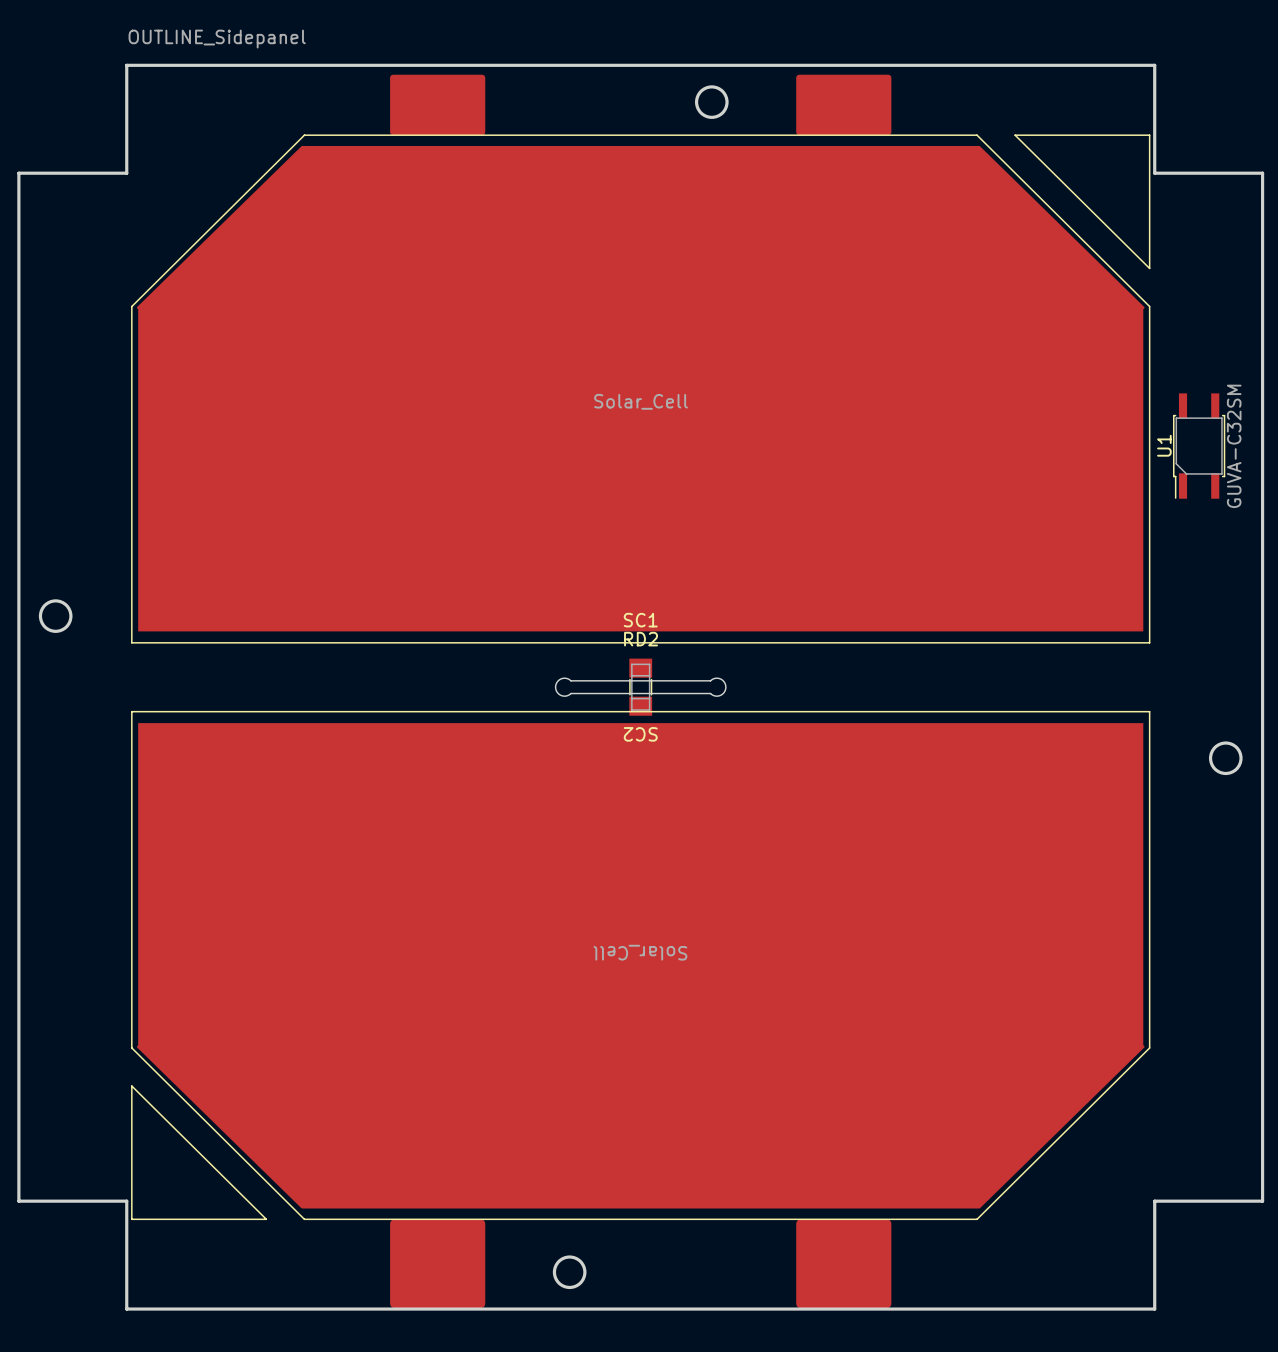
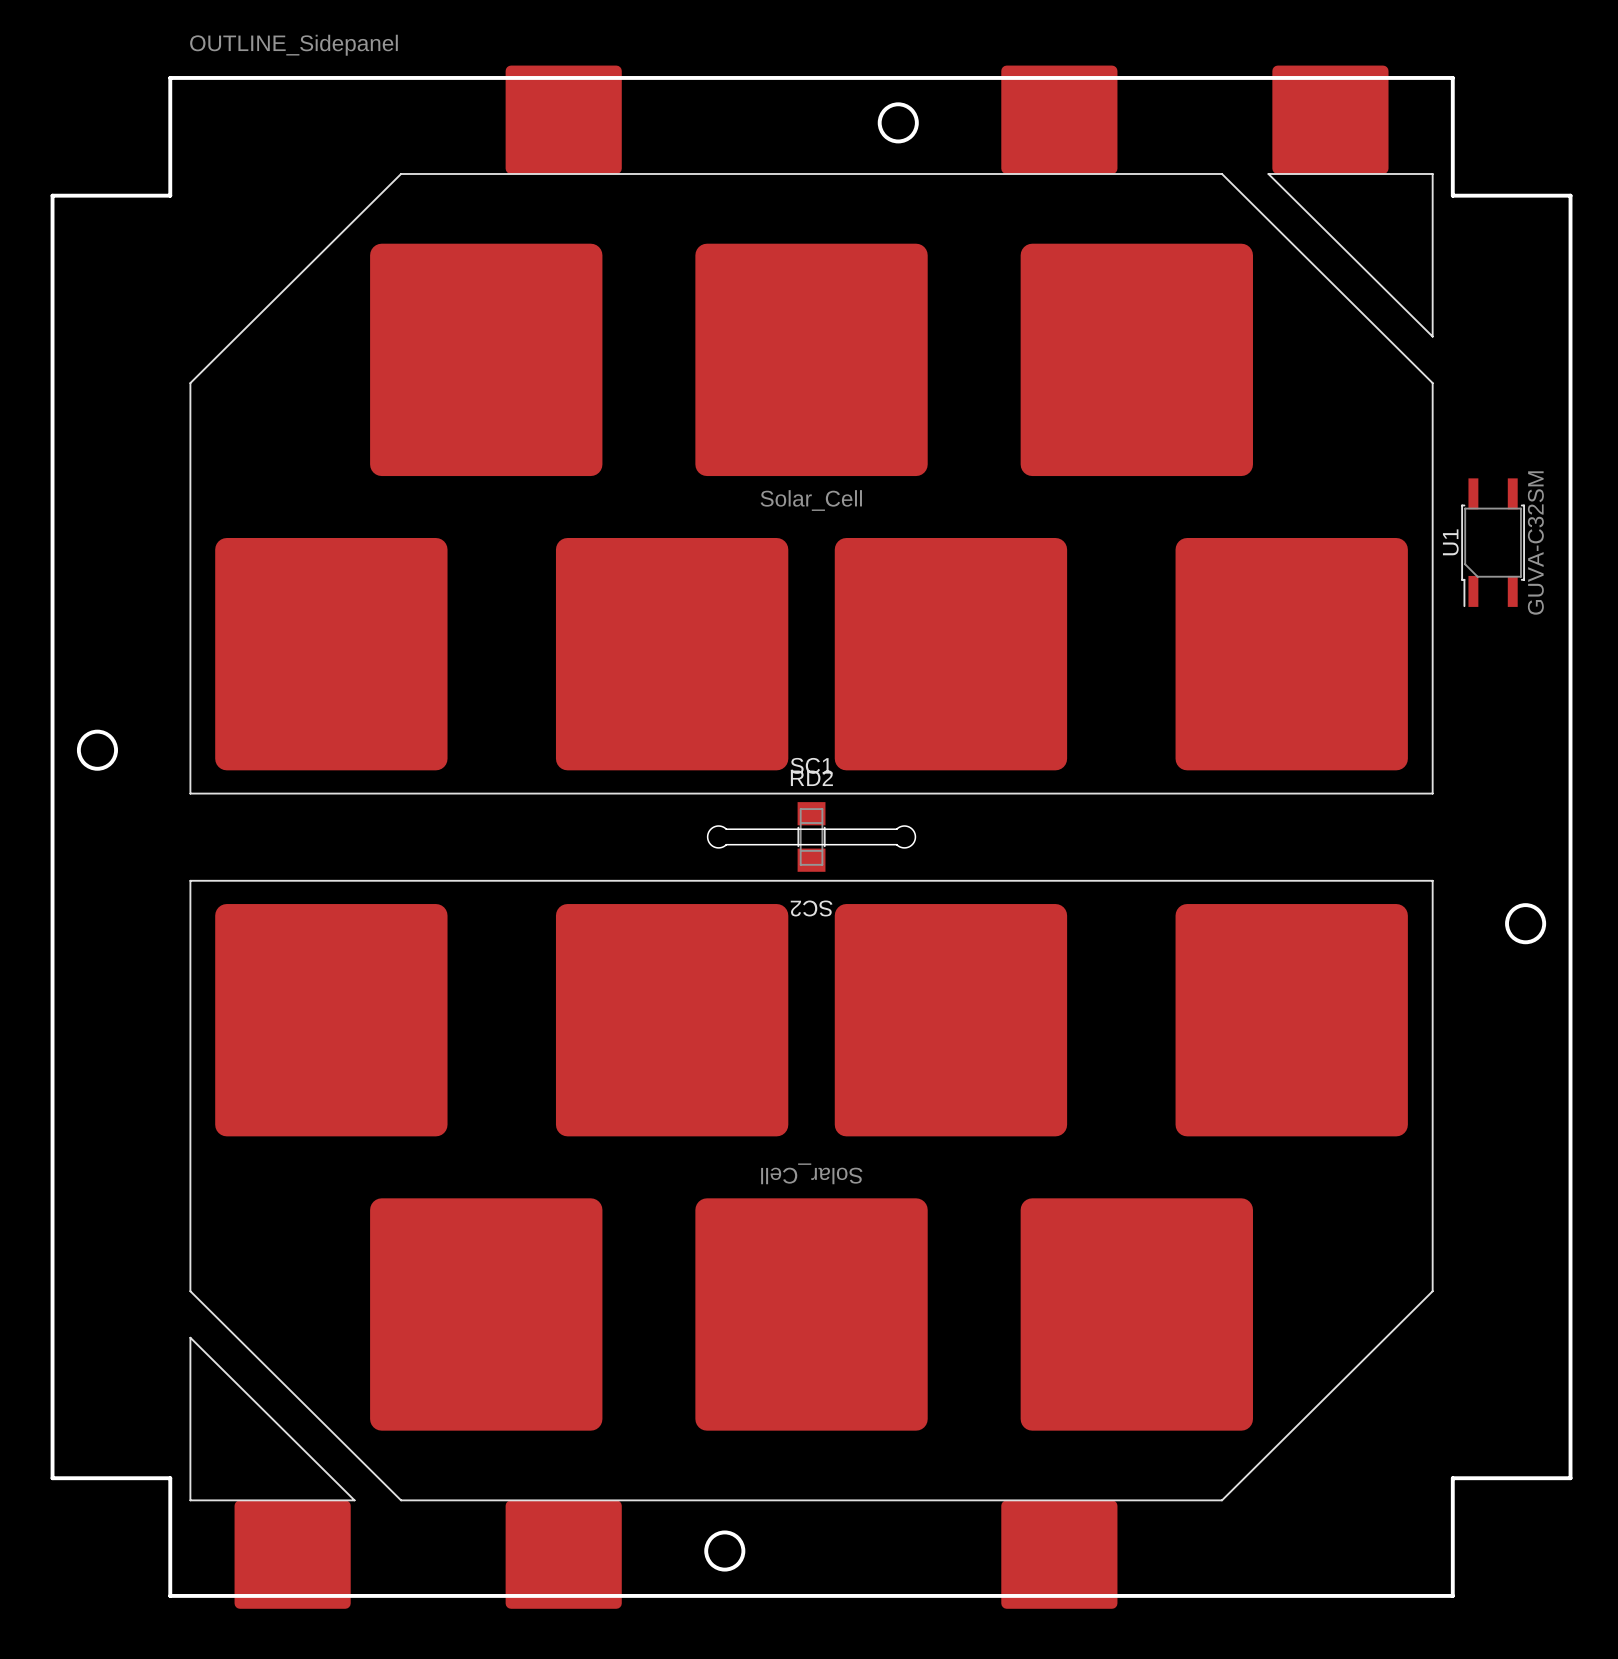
drawing shape: [17, 29, 1265, 1311] -> [50, 34, 1573, 1598]
SC1 footprint: [131, 74, 1151, 644] -> [189, 65, 1434, 795]
SC2 footprint: [131, 710, 1151, 1309] -> [189, 879, 1434, 1609]

